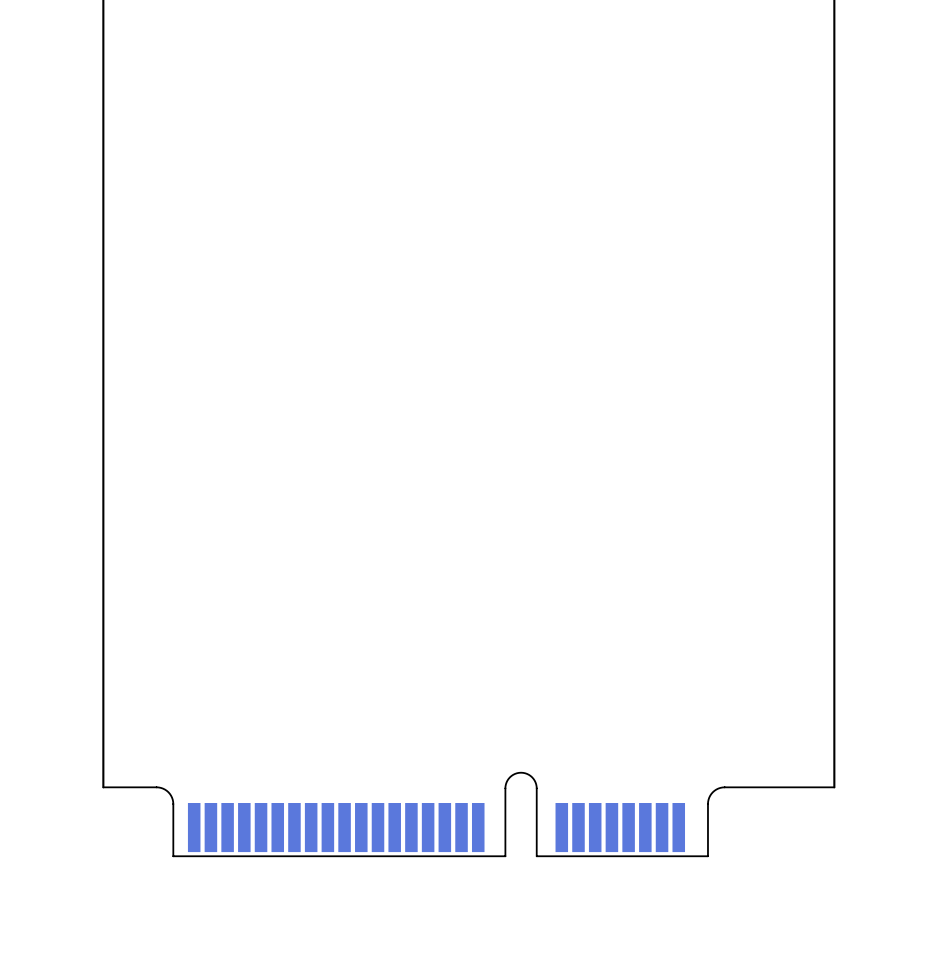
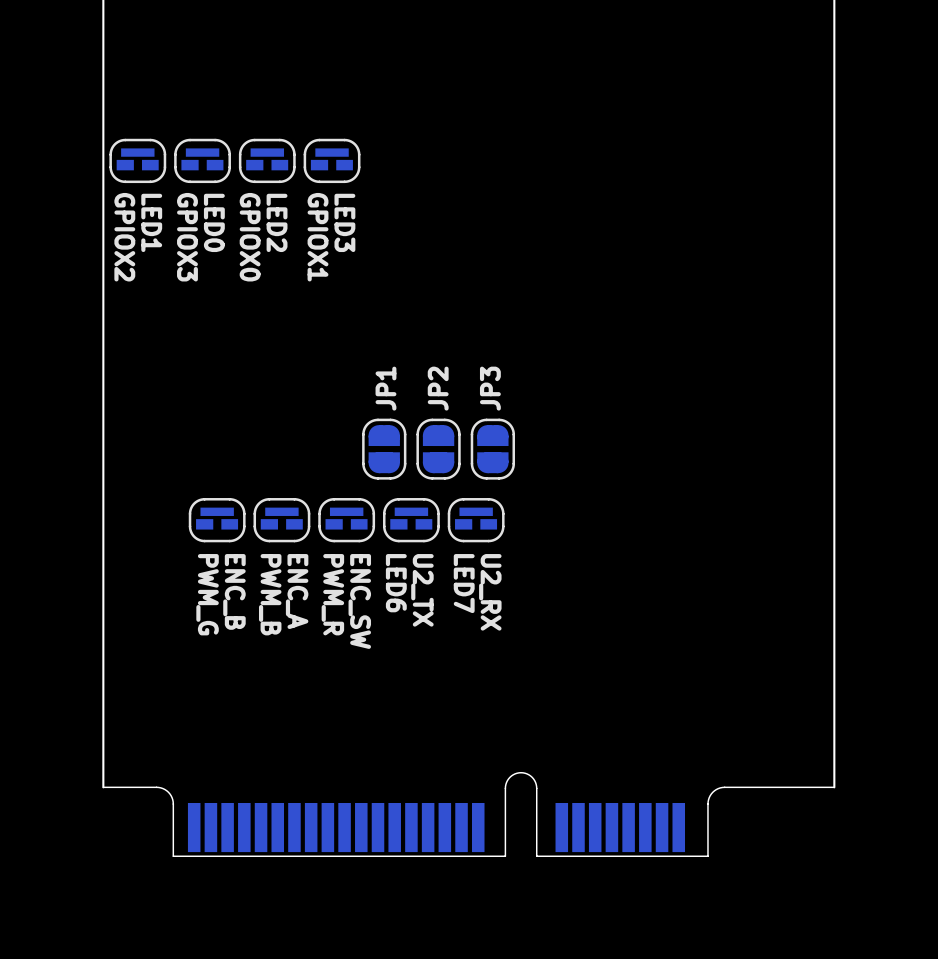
part: none -> (137, 160)
part: none -> (202, 160)
part: none -> (267, 160)
part: none -> (332, 160)
text: none -> LED2 (277, 222)
text: none -> LED3 (344, 222)
text: none -> LED1 (151, 222)
text: none -> LED0 (214, 222)
text: none -> GPIOX2 (124, 237)
text: none -> GPIOX3 (187, 237)
text: none -> GPIOX0 (250, 237)
text: none -> GPIOX1 (318, 237)
text: none -> JP1 (385, 388)
text: none -> JP2 (438, 388)
text: none -> JP3 (490, 388)
part: none -> (384, 449)
part: none -> (438, 449)
part: none -> (492, 449)
part: none -> (217, 520)
part: none -> (281, 520)
part: none -> (346, 520)
part: none -> (411, 520)
part: none -> (476, 520)
text: none -> LED6 (396, 583)
text: none -> LED7 (464, 583)
text: none -> ENC_B (234, 591)
text: none -> U2_TX (422, 590)
text: none -> ENC_A (297, 591)
text: none -> U2_RX (490, 592)
text: none -> PWM_B (270, 594)
text: none -> PWM_G (207, 594)
text: none -> PWM_R (332, 594)
text: none -> ENC_SW (359, 601)

